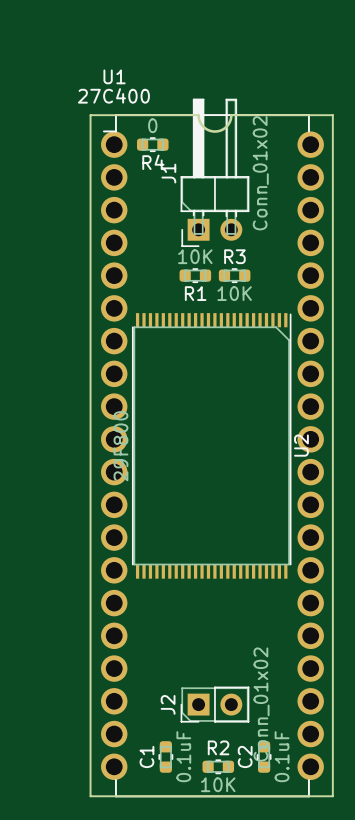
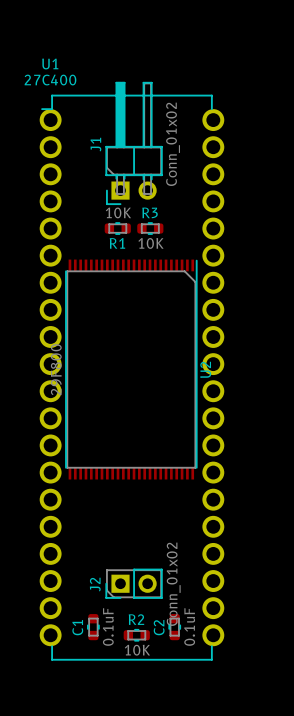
board edge: (90, 115) (198, 115) (203, 126) (214, 131) (226, 126) (231, 115) (332, 115) (332, 796) (90, 796) (90, 115) -> none
R4: 0 (152, 144) -> none

